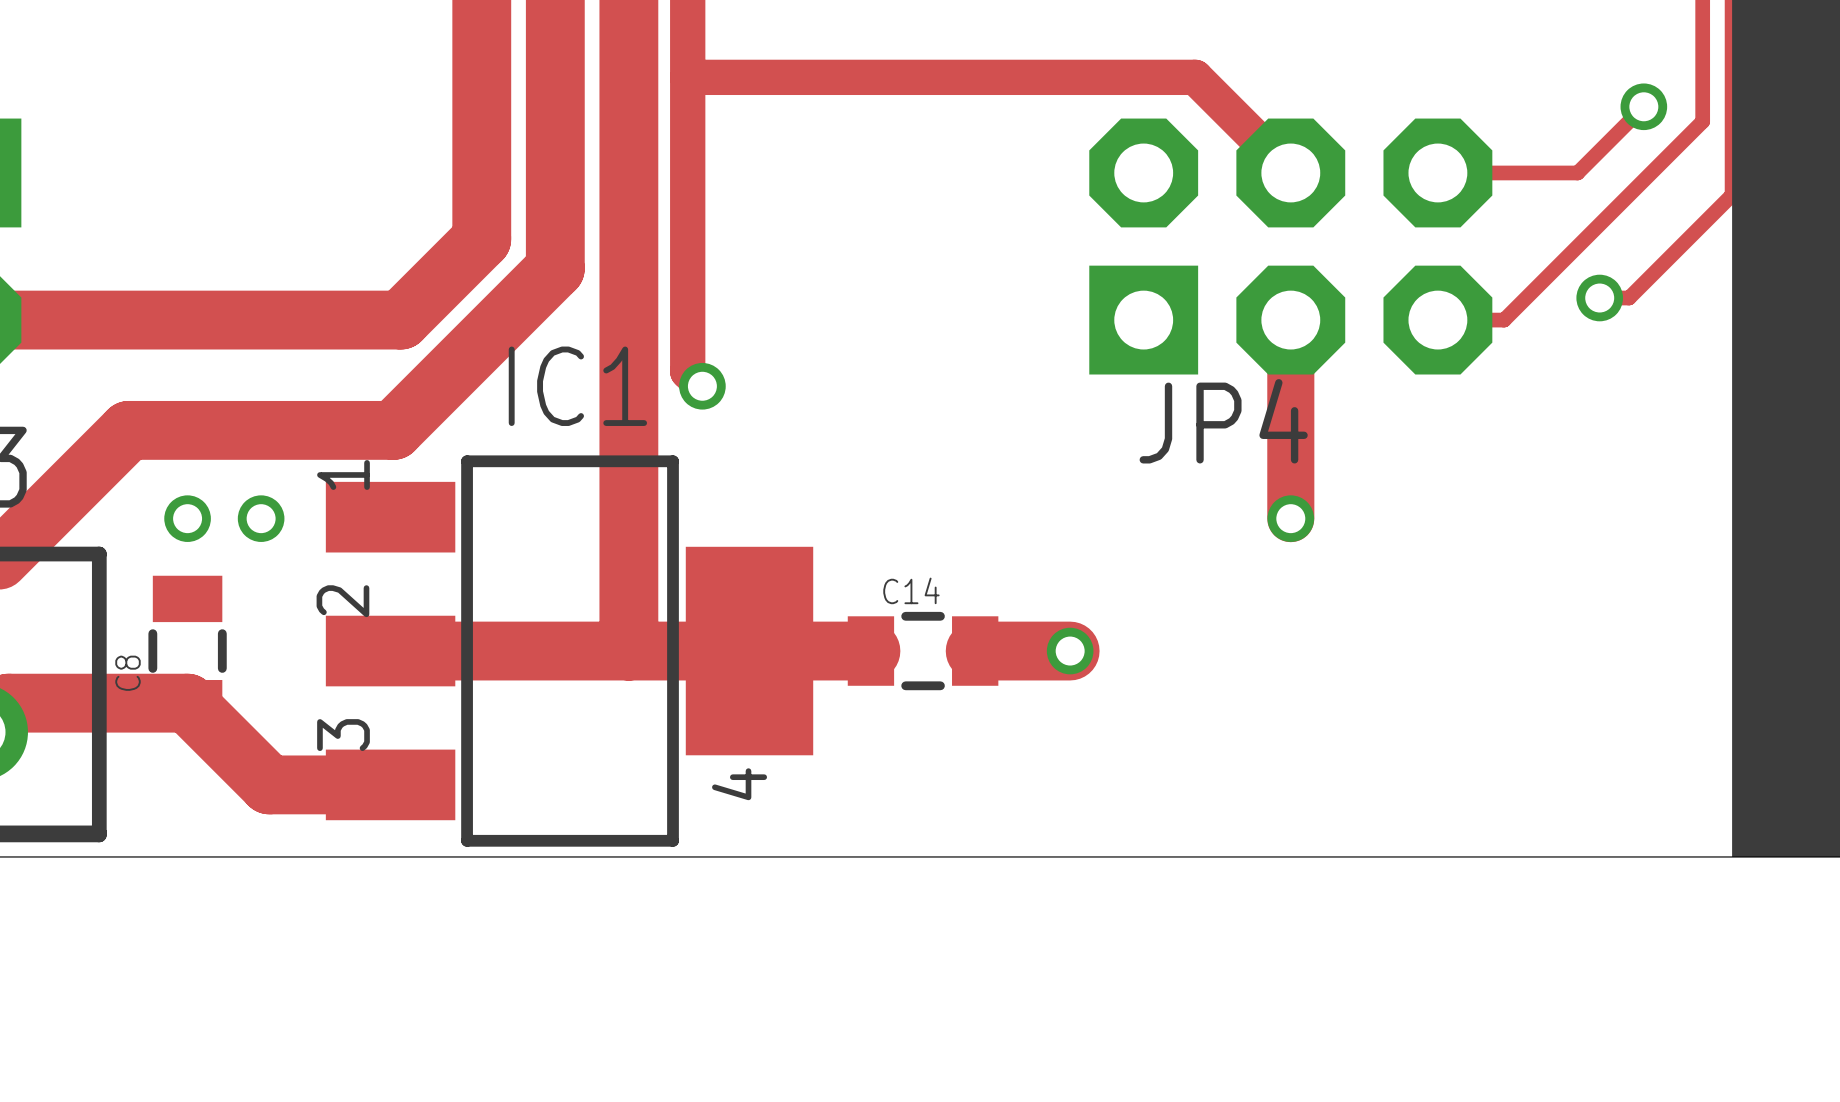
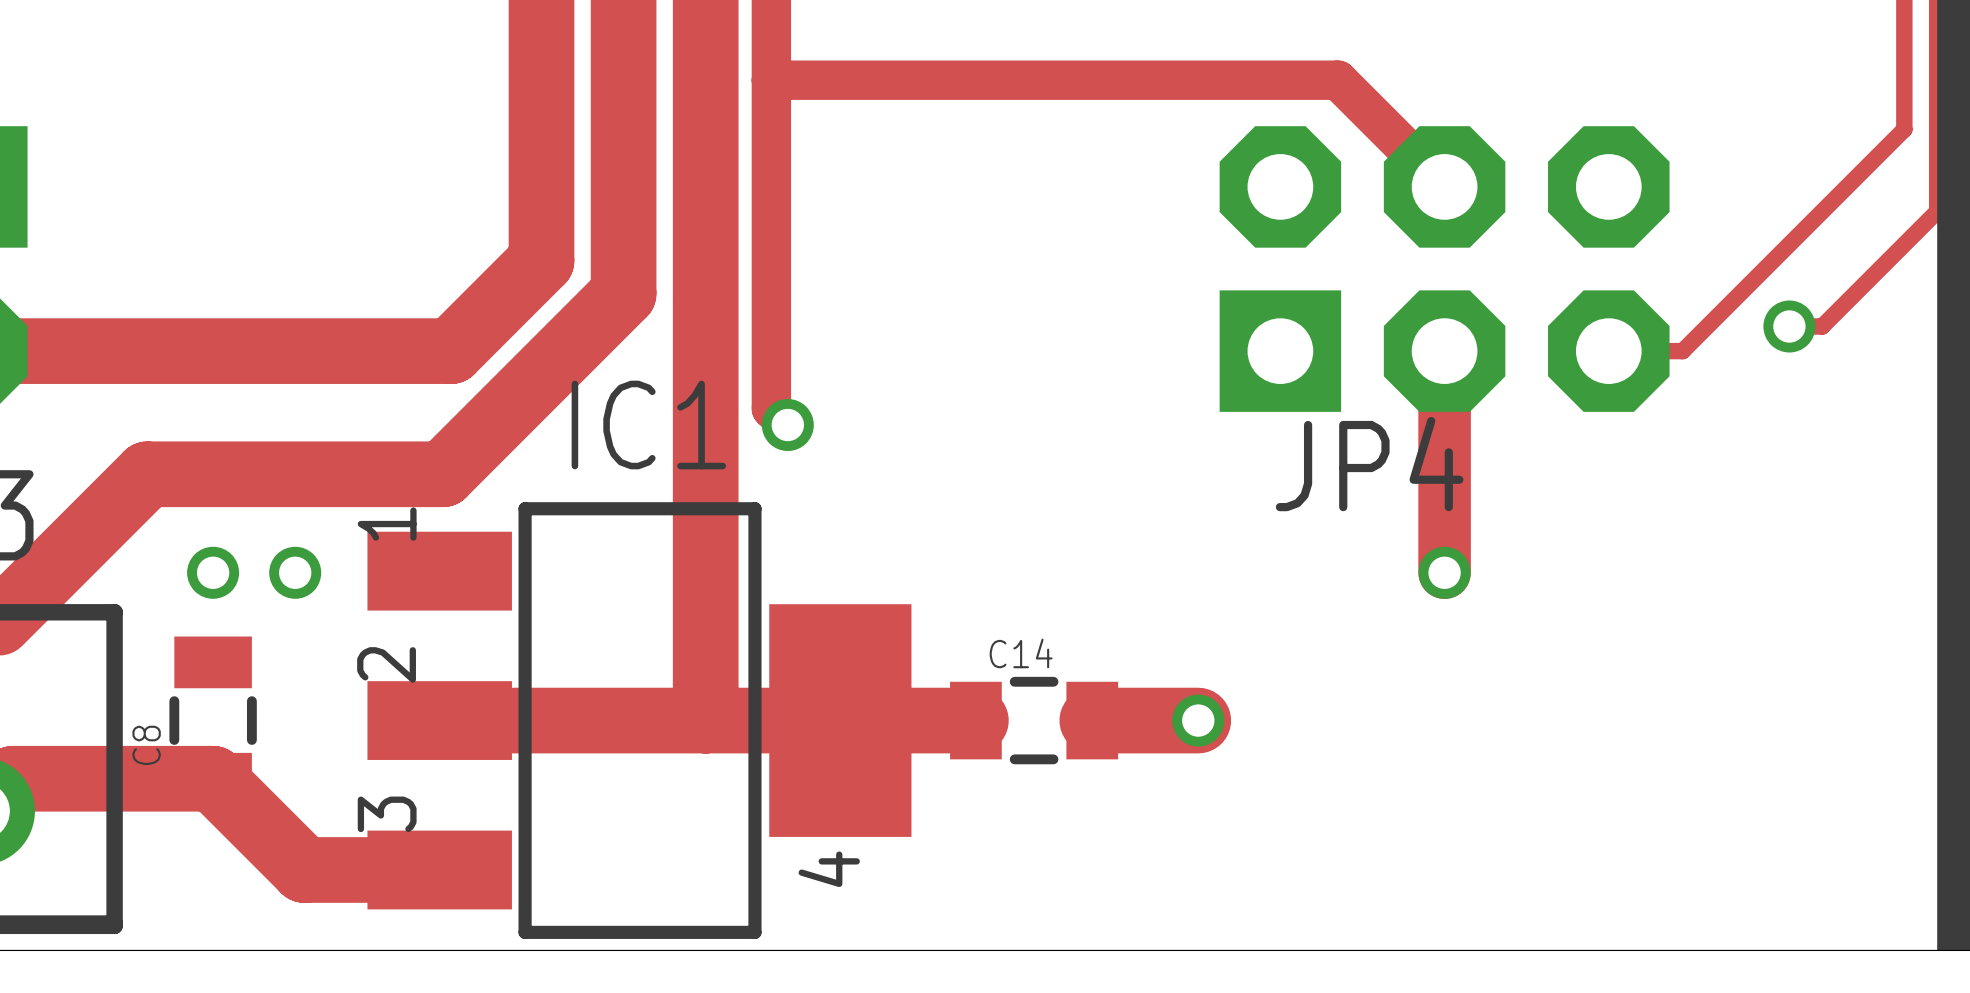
track: (1643, 106) (1577, 172) (1437, 172) -> none
via: (1643, 106) -> none

